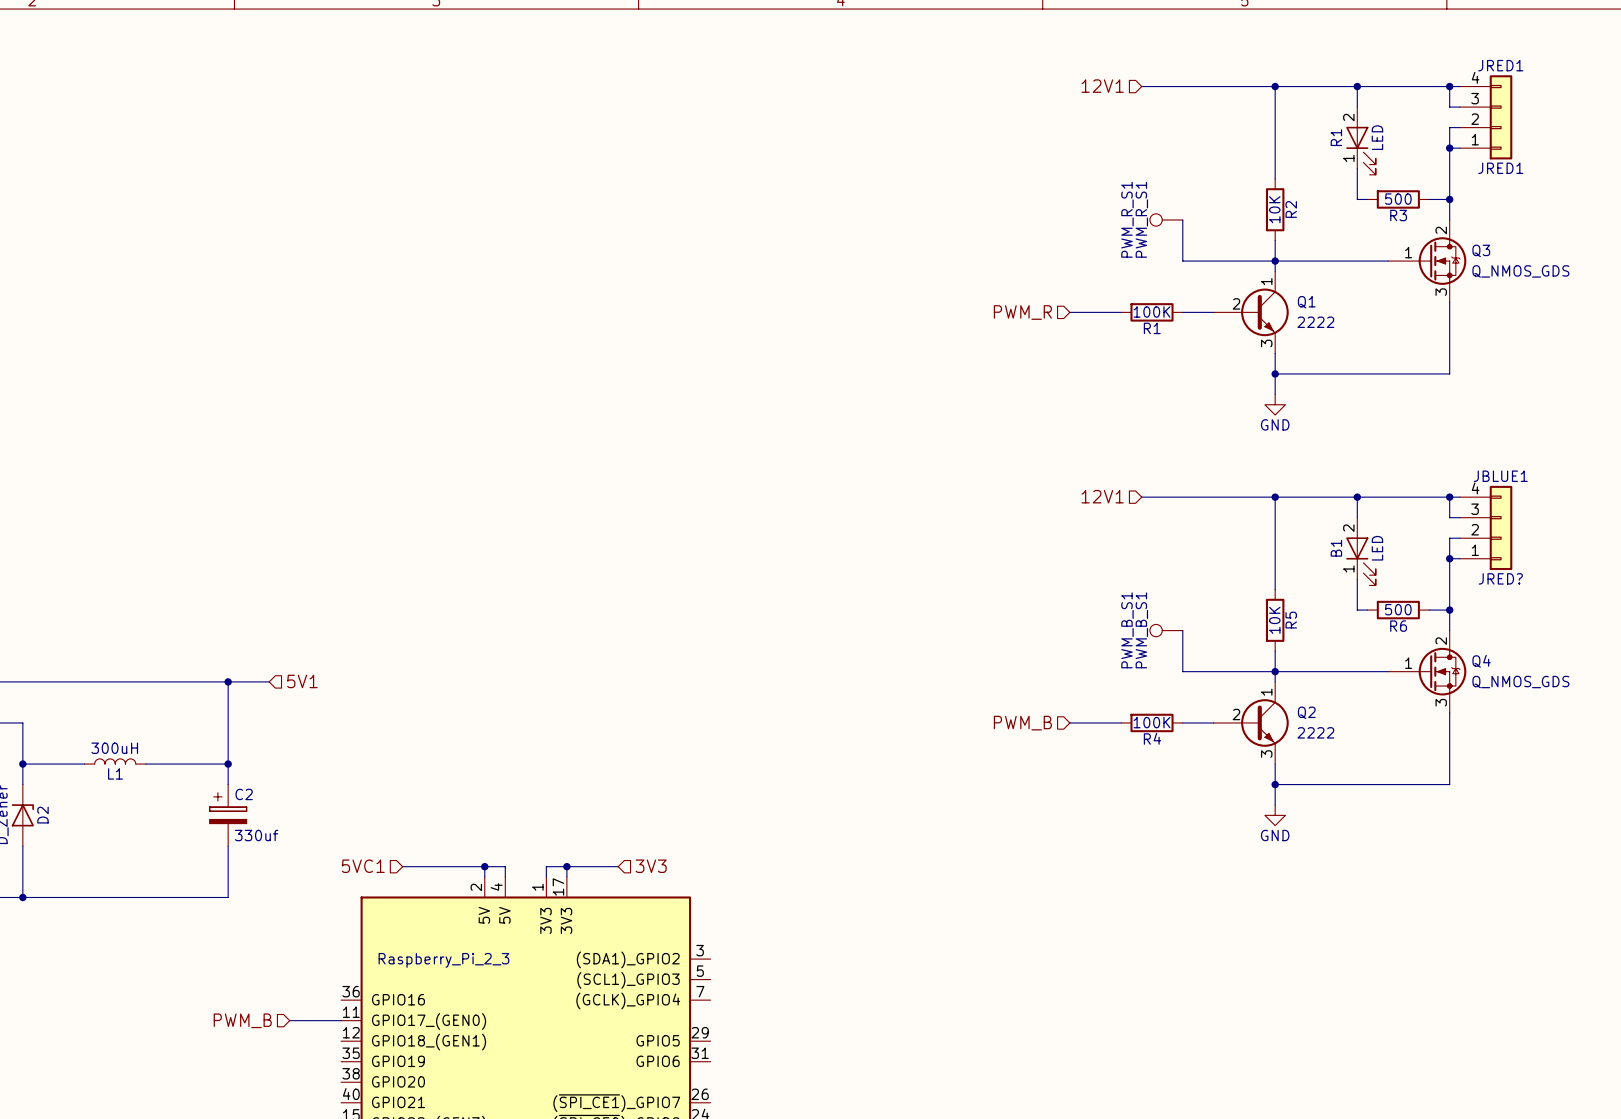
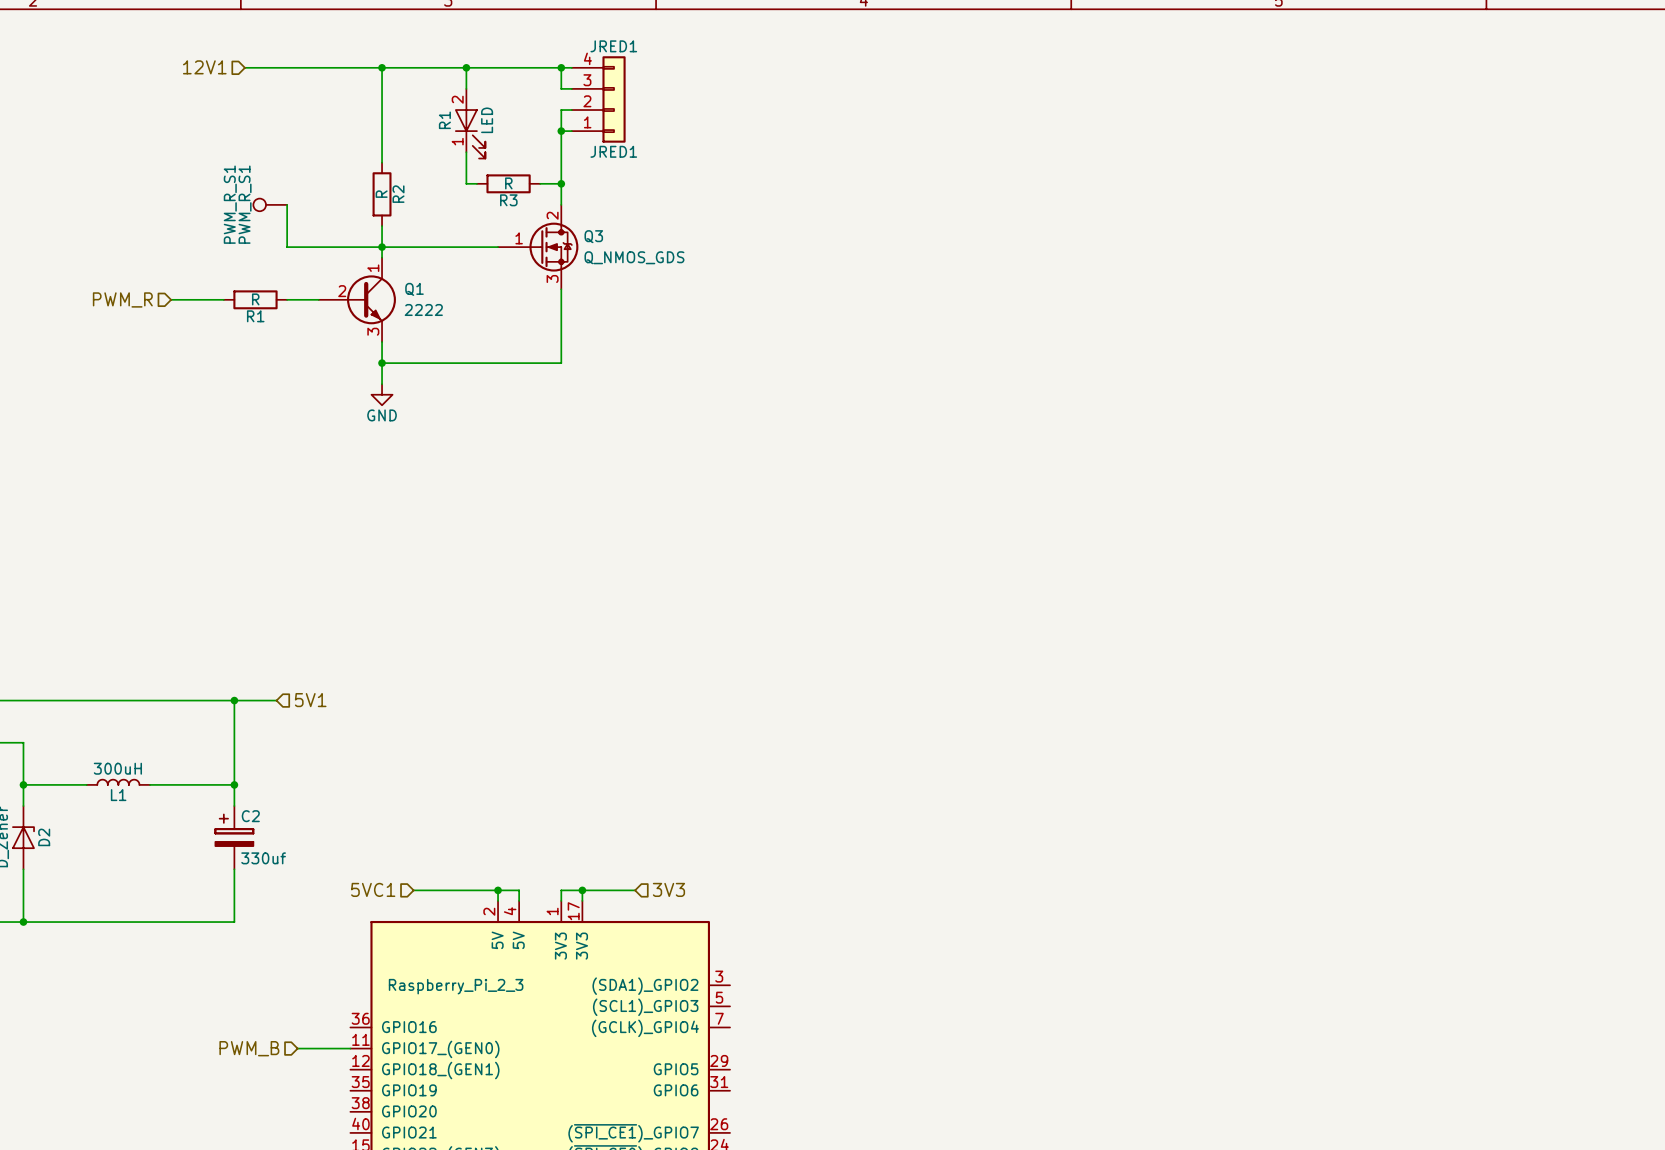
hierarchical label: none -> 12V1 (204, 67)
wire: none -> (244, 67) (571, 67)
wire: none -> (382, 67) (382, 162)
junction: none -> (382, 67)
wire: none -> (466, 67) (466, 88)
junction: none -> (466, 67)
wire: none -> (561, 67) (561, 88) (571, 88)
junction: none -> (561, 67)
hierarchical label: 12V1 (1102, 86) -> none
wire: (1141, 86) (1459, 86) -> none
wire: (1275, 86) (1275, 178) -> none
junction: (1275, 86) -> none
wire: (1357, 86) (1357, 107) -> none
junction: (1357, 86) -> none
wire: (1449, 86) (1449, 107) (1459, 107) -> none
junction: (1449, 86) -> none
wire: none -> (571, 110) (561, 110) (561, 204)
JRED1 position: (1486, 117) -> (598, 99)
R1: none -> LED (470, 123)
wire: none -> (561, 131) (571, 131)
junction: none -> (561, 131)
wire: (1459, 127) (1449, 127) (1449, 219) -> none
R1: LED (1360, 140) -> none
wire: none -> (466, 152) (466, 183) (476, 183)
wire: (1449, 148) (1459, 148) -> none
junction: (1449, 148) -> none
wire: (1357, 168) (1357, 199) (1367, 199) -> none
wire: none -> (540, 183) (561, 183)
junction: none -> (561, 183)
wire: none -> (287, 204) (287, 247) (498, 247)
R3 position: (1398, 199) -> (508, 183)
R3 value: 500 (1398, 199) -> R (508, 183)
wire: (1429, 199) (1449, 199) -> none
junction: (1449, 199) -> none
R2 value: 10K (1274, 209) -> R (381, 194)
R2 position: (1275, 209) -> (382, 194)
wire: none -> (382, 226) (382, 257)
PWM_R_S1 position: (1166, 219) -> (270, 204)
wire: (1182, 219) (1182, 261) (1388, 261) -> none
junction: none -> (382, 247)
wire: (1275, 240) (1275, 271) -> none
junction: (1275, 261) -> none
Q3 position: (1427, 261) -> (538, 247)
wire: none -> (561, 289) (561, 363) (382, 363)
hierarchical label: none -> PWM_R (122, 299)
wire: none -> (171, 299) (223, 299)
R1: none -> R (255, 299)
wire: none -> (287, 299) (318, 299)
wire: (1449, 302) (1449, 373) (1275, 373) -> none
hierarchical label: PWM_R (1022, 312) -> none
wire: (1069, 312) (1121, 312) -> none
R1: 100K (1152, 312) -> none
wire: (1182, 312) (1213, 312) -> none
Q1 position: (1251, 312) -> (357, 299)
wire: none -> (382, 342) (382, 384)
junction: none -> (382, 363)
wire: (1275, 353) (1275, 394) -> none
junction: (1275, 373) -> none
power symbol: none -> GND (382, 394)
power symbol: GND (1275, 404) -> none
hierarchical label: 12V1 (1102, 496) -> none
wire: (1141, 497) (1459, 497) -> none
wire: (1275, 497) (1275, 589) -> none
junction: (1275, 497) -> none
wire: (1357, 497) (1357, 517) -> none
junction: (1357, 497) -> none
wire: (1449, 497) (1449, 517) (1459, 517) -> none
junction: (1449, 497) -> none
JRED?: JBLUE1 (1486, 527) -> none
wire: (1459, 538) (1449, 538) (1449, 630) -> none
B1: LED (1360, 551) -> none
wire: (1449, 558) (1459, 558) -> none
junction: (1449, 558) -> none
wire: (1357, 579) (1357, 610) (1367, 610) -> none
R6: 500 (1398, 610) -> none
wire: (1429, 610) (1449, 610) -> none
junction: (1449, 610) -> none
R5: 10K (1275, 620) -> none
PWM_B_S1: PWM_B_S1 (1166, 630) -> none
wire: (1182, 630) (1182, 671) (1388, 671) -> none
wire: (1275, 651) (1275, 681) -> none
junction: (1275, 671) -> none
Q4: Q_NMOS_GDS (1427, 671) -> none
wire: (1449, 712) (1449, 784) (1275, 784) -> none
wire: (1069, 722) (1121, 722) -> none
R4: 100K (1152, 722) -> none
wire: (1182, 722) (1213, 722) -> none
Q2: 2222 (1251, 722) -> none
hierarchical label: PWM_B (1022, 723) -> none
wire: (1275, 764) (1275, 805) -> none
junction: (1275, 784) -> none
power symbol: GND (1275, 815) -> none

